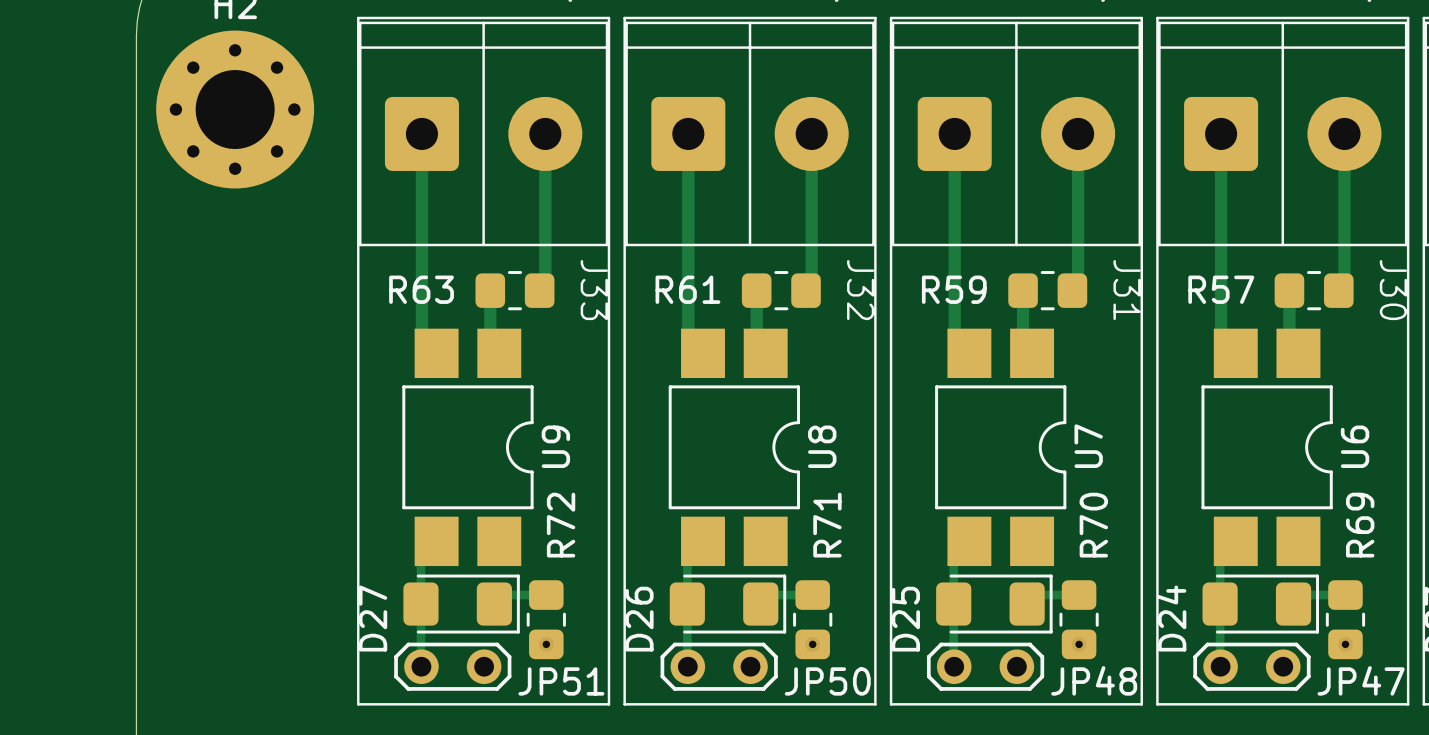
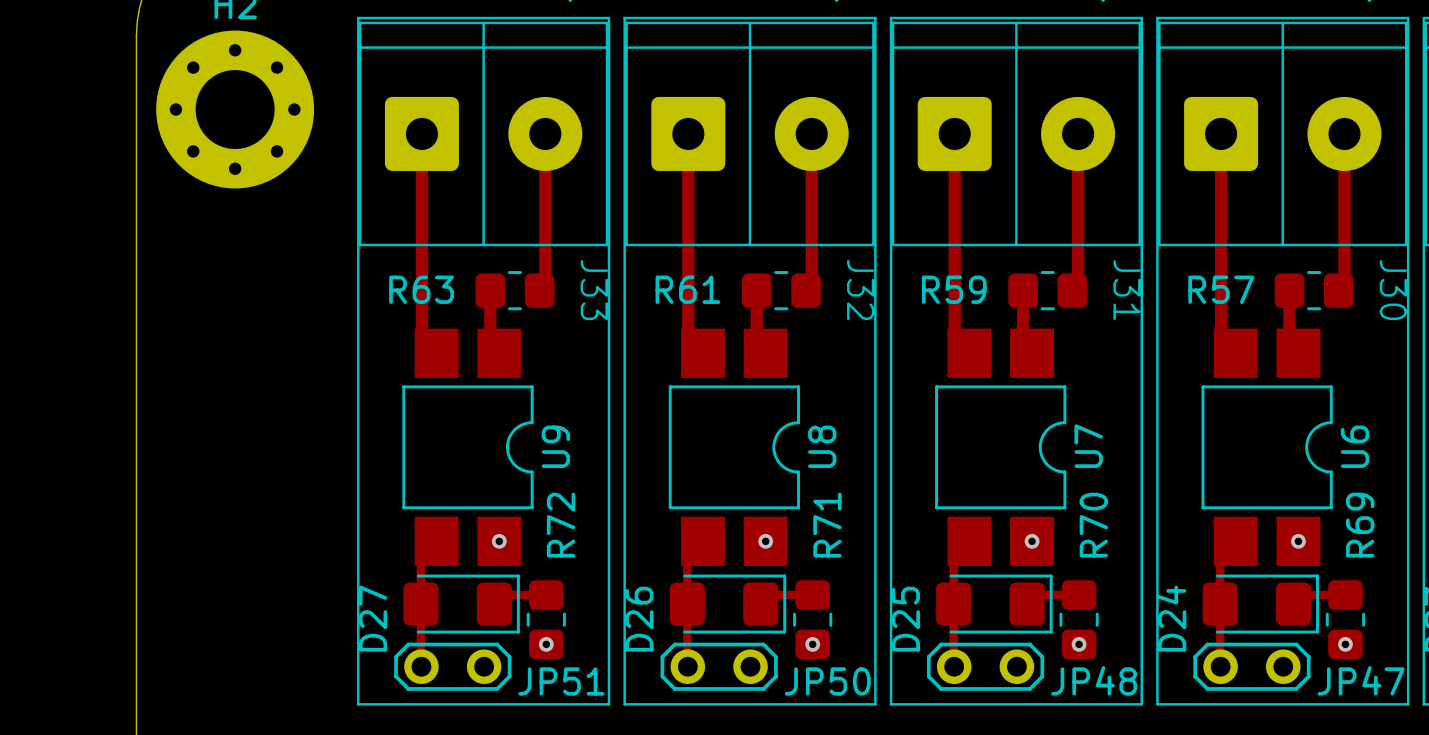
via: none -> (499, 541)
via: none -> (765, 541)
via: none -> (1032, 541)
via: none -> (1298, 541)

